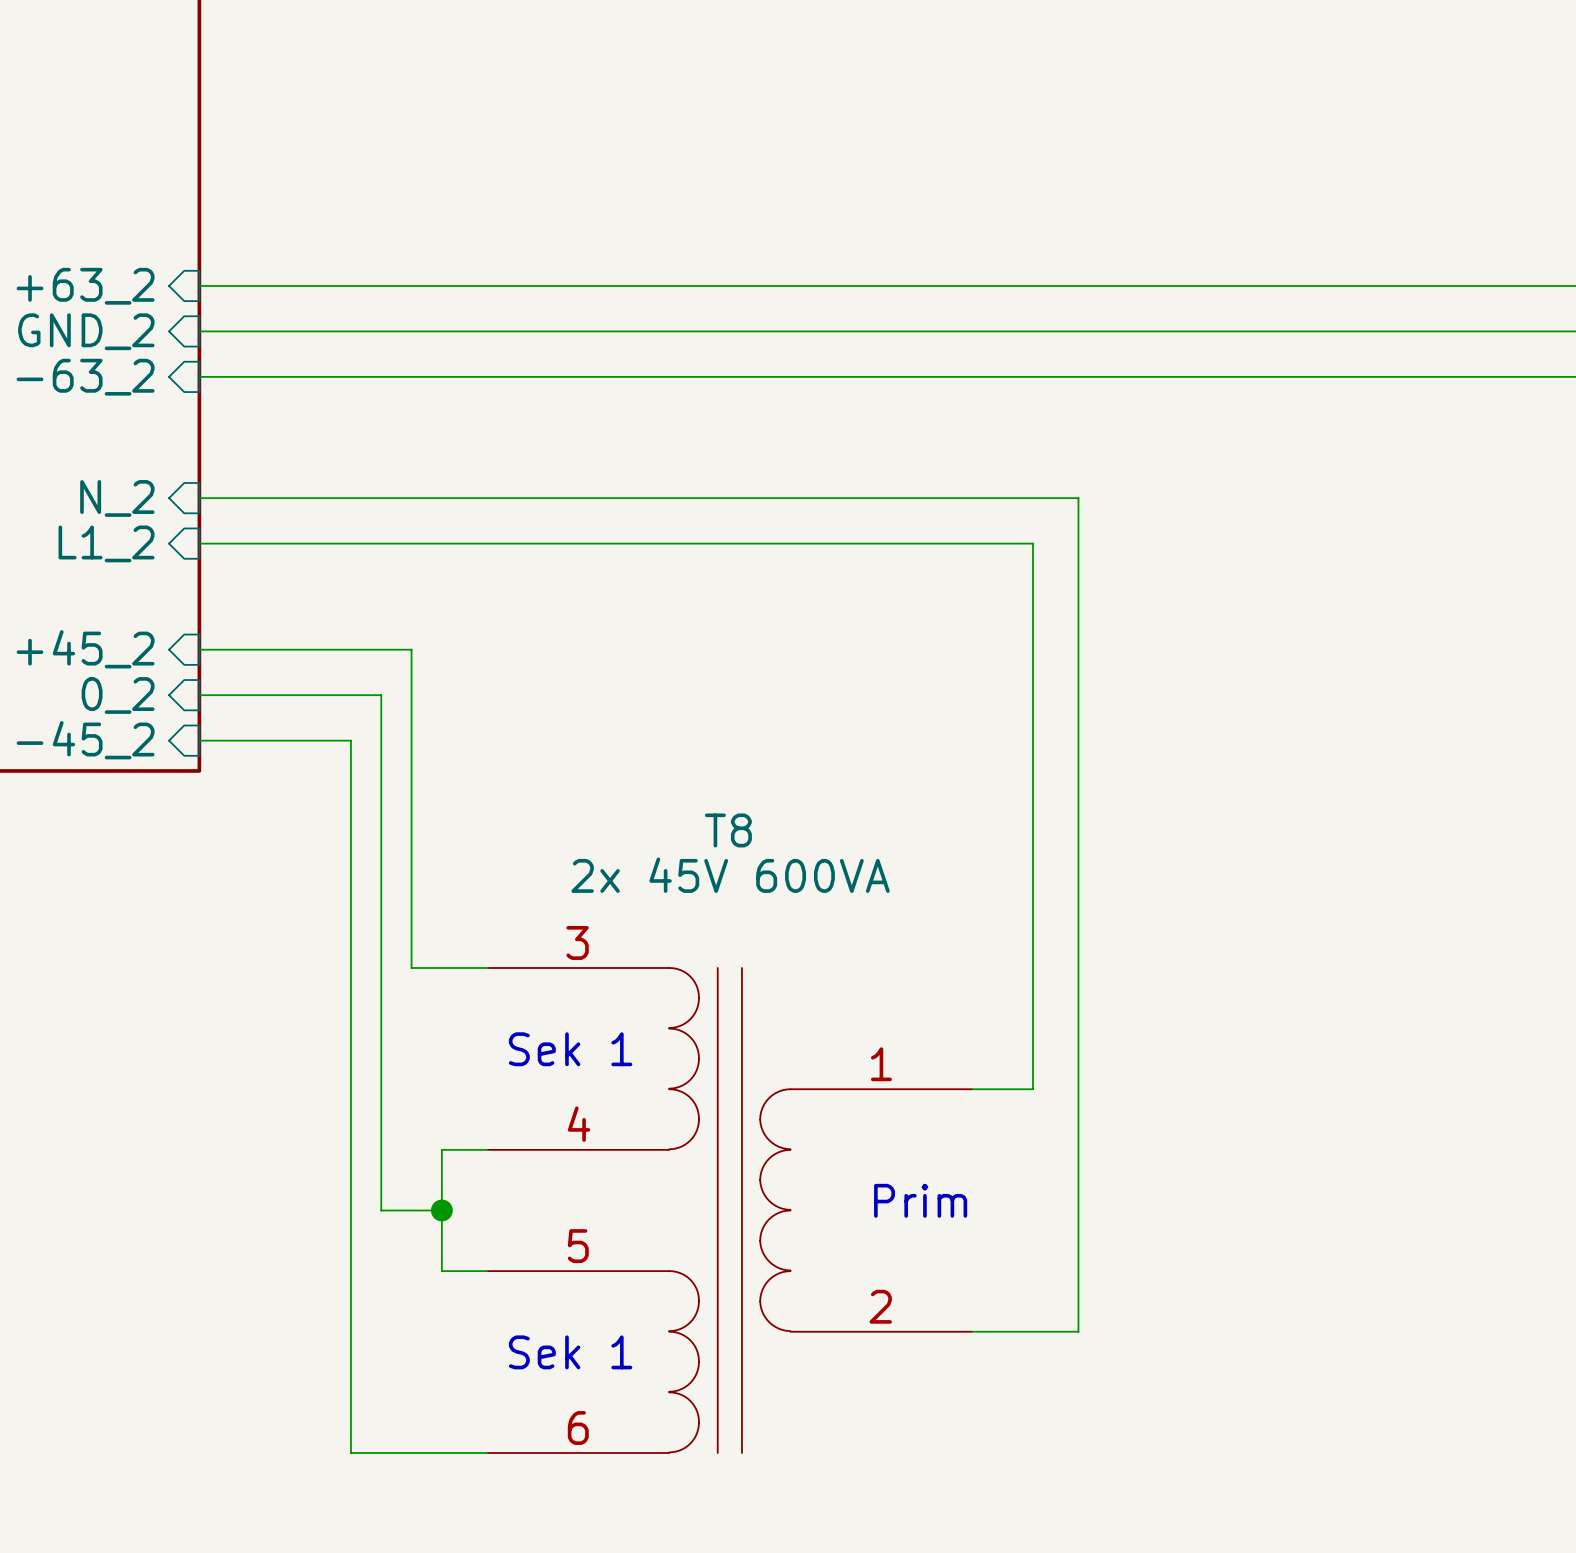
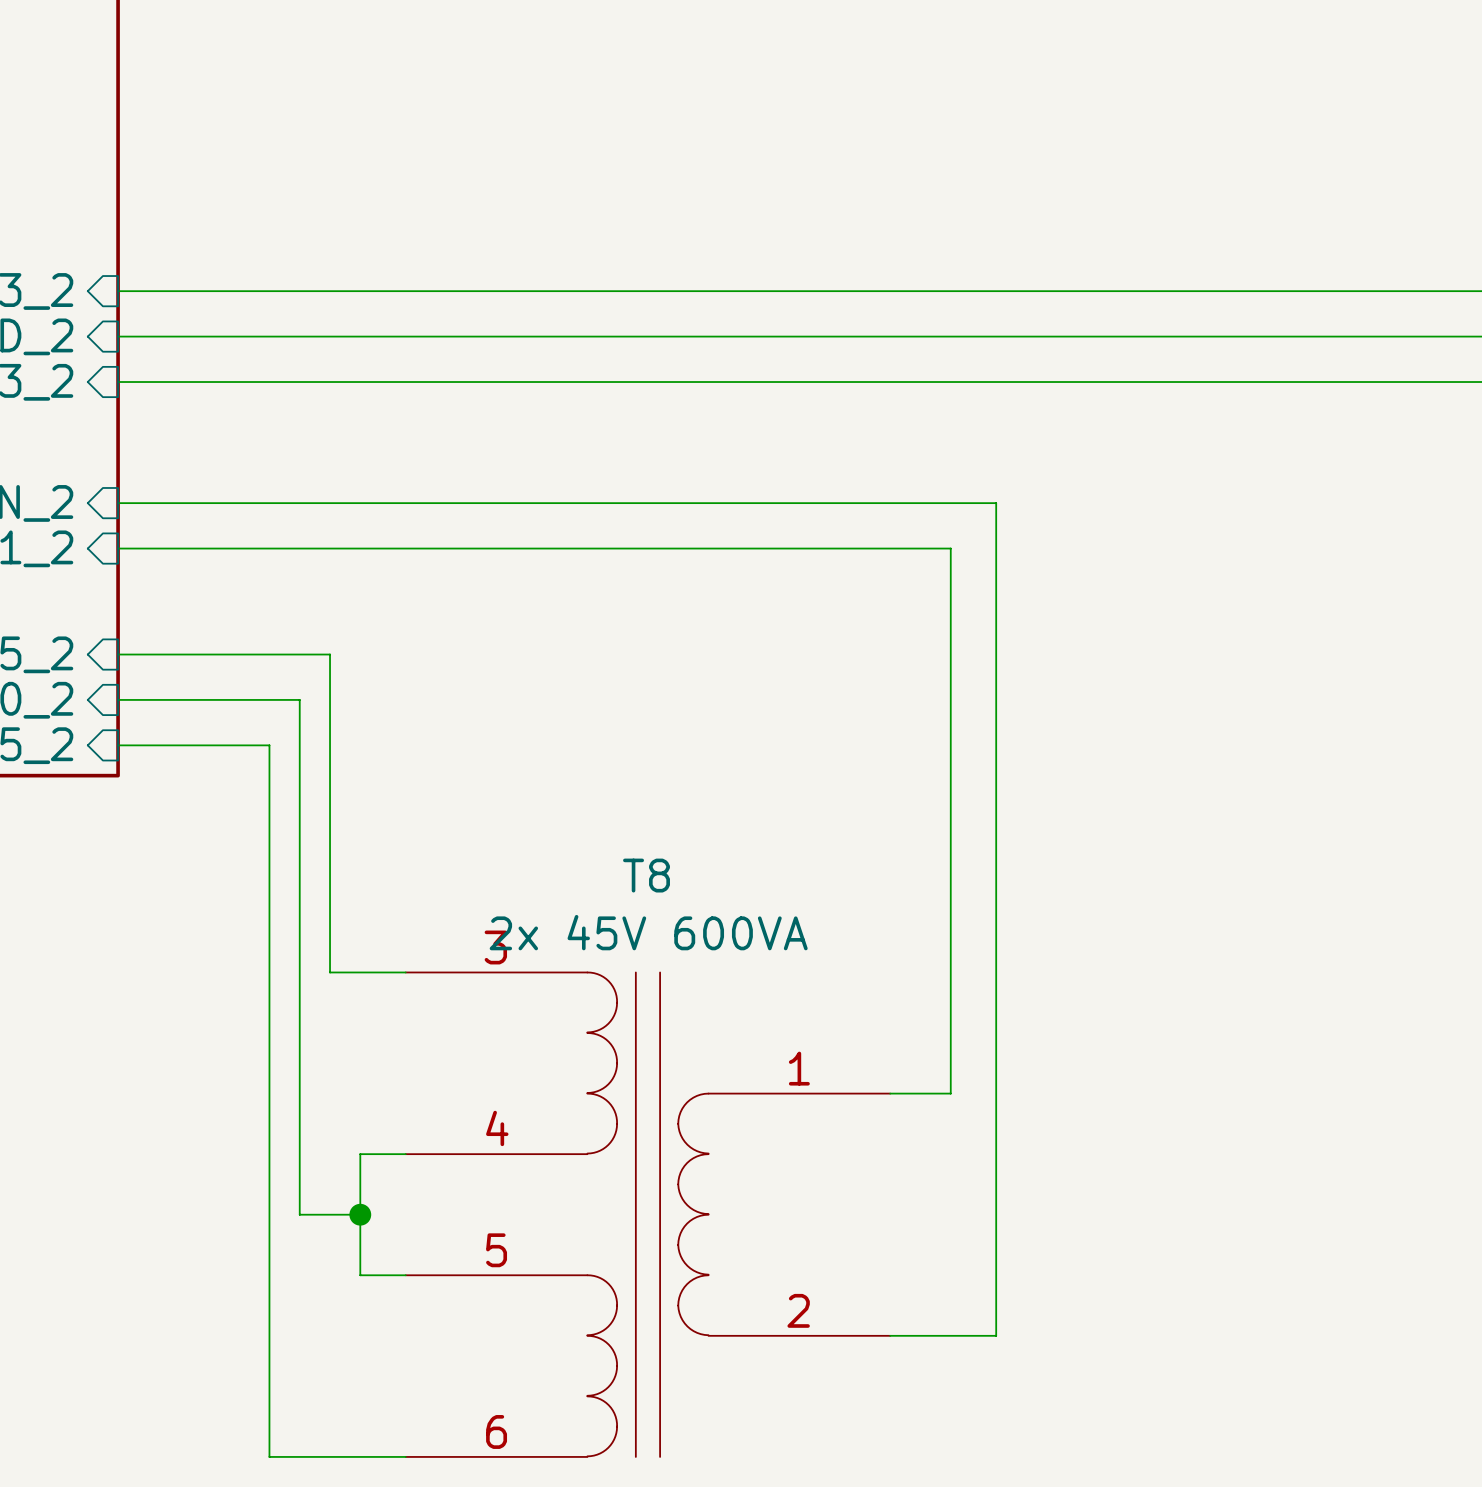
T8 name position: T8 (728, 830) -> T8 (646, 875)
T8 value position: 2x 45V 600VA (730, 875) -> 2x 45V 600VA (648, 932)
text: Sek 1 (570, 1049) -> none
text: Prim (920, 1200) -> none
text: Sek 1 (570, 1352) -> none

